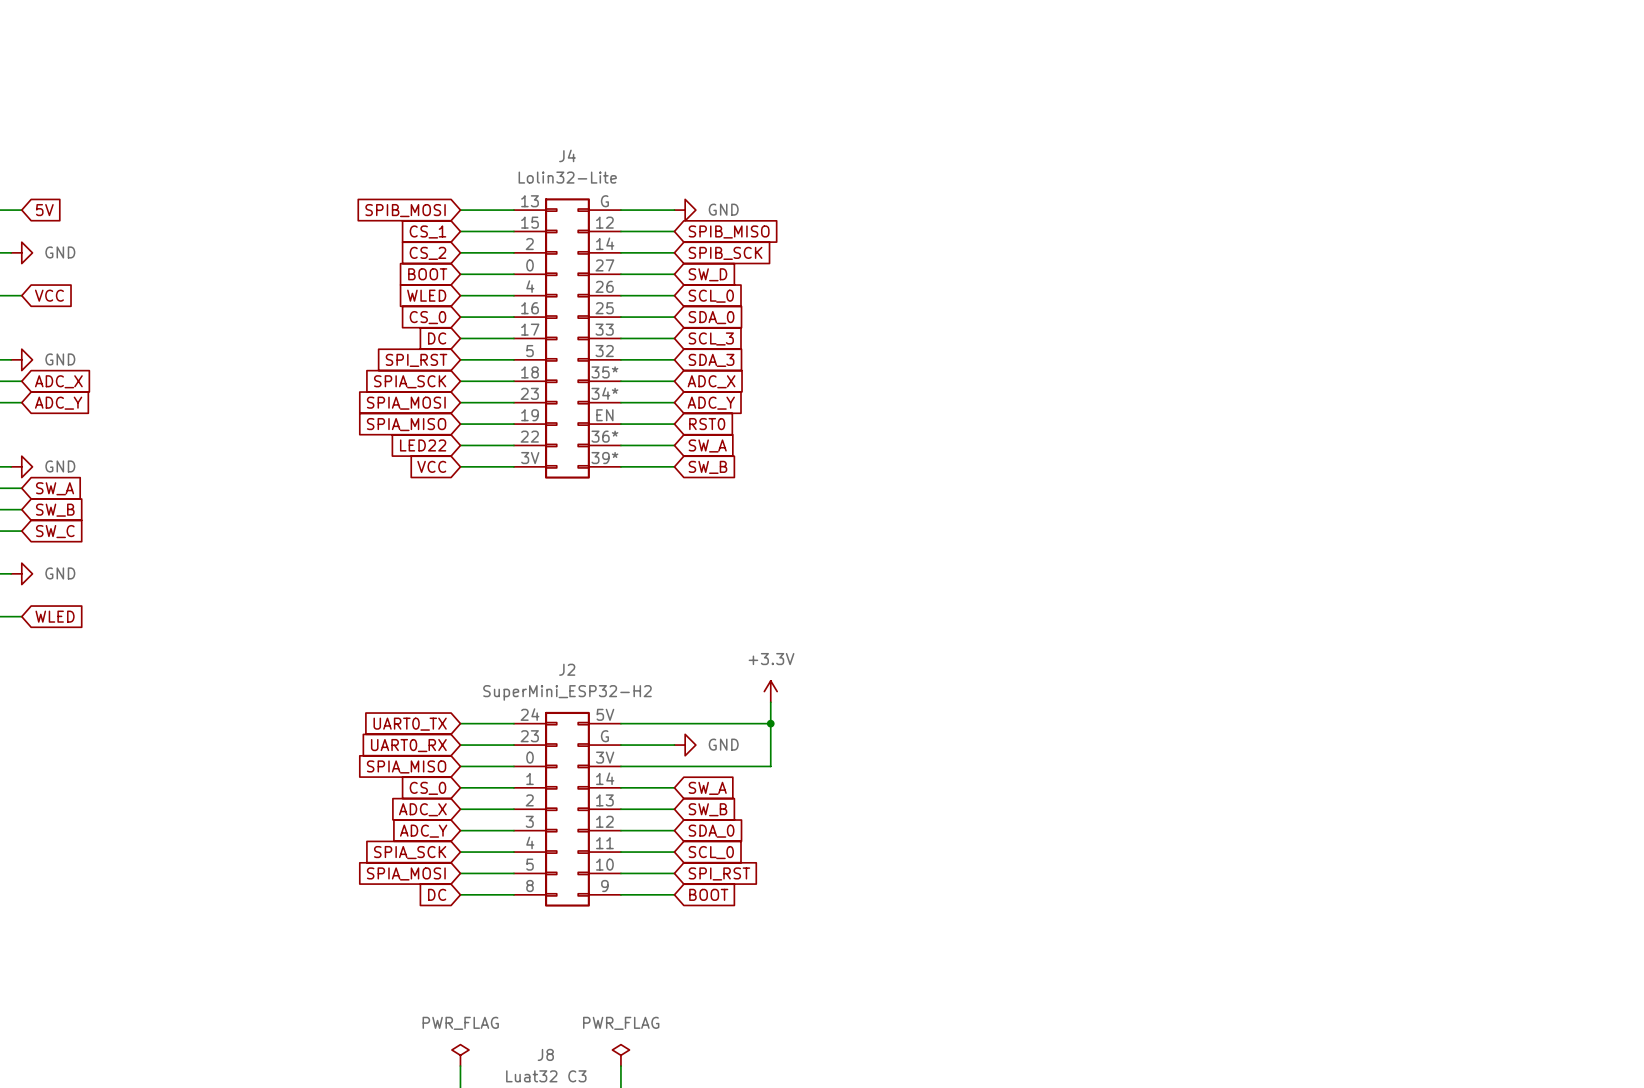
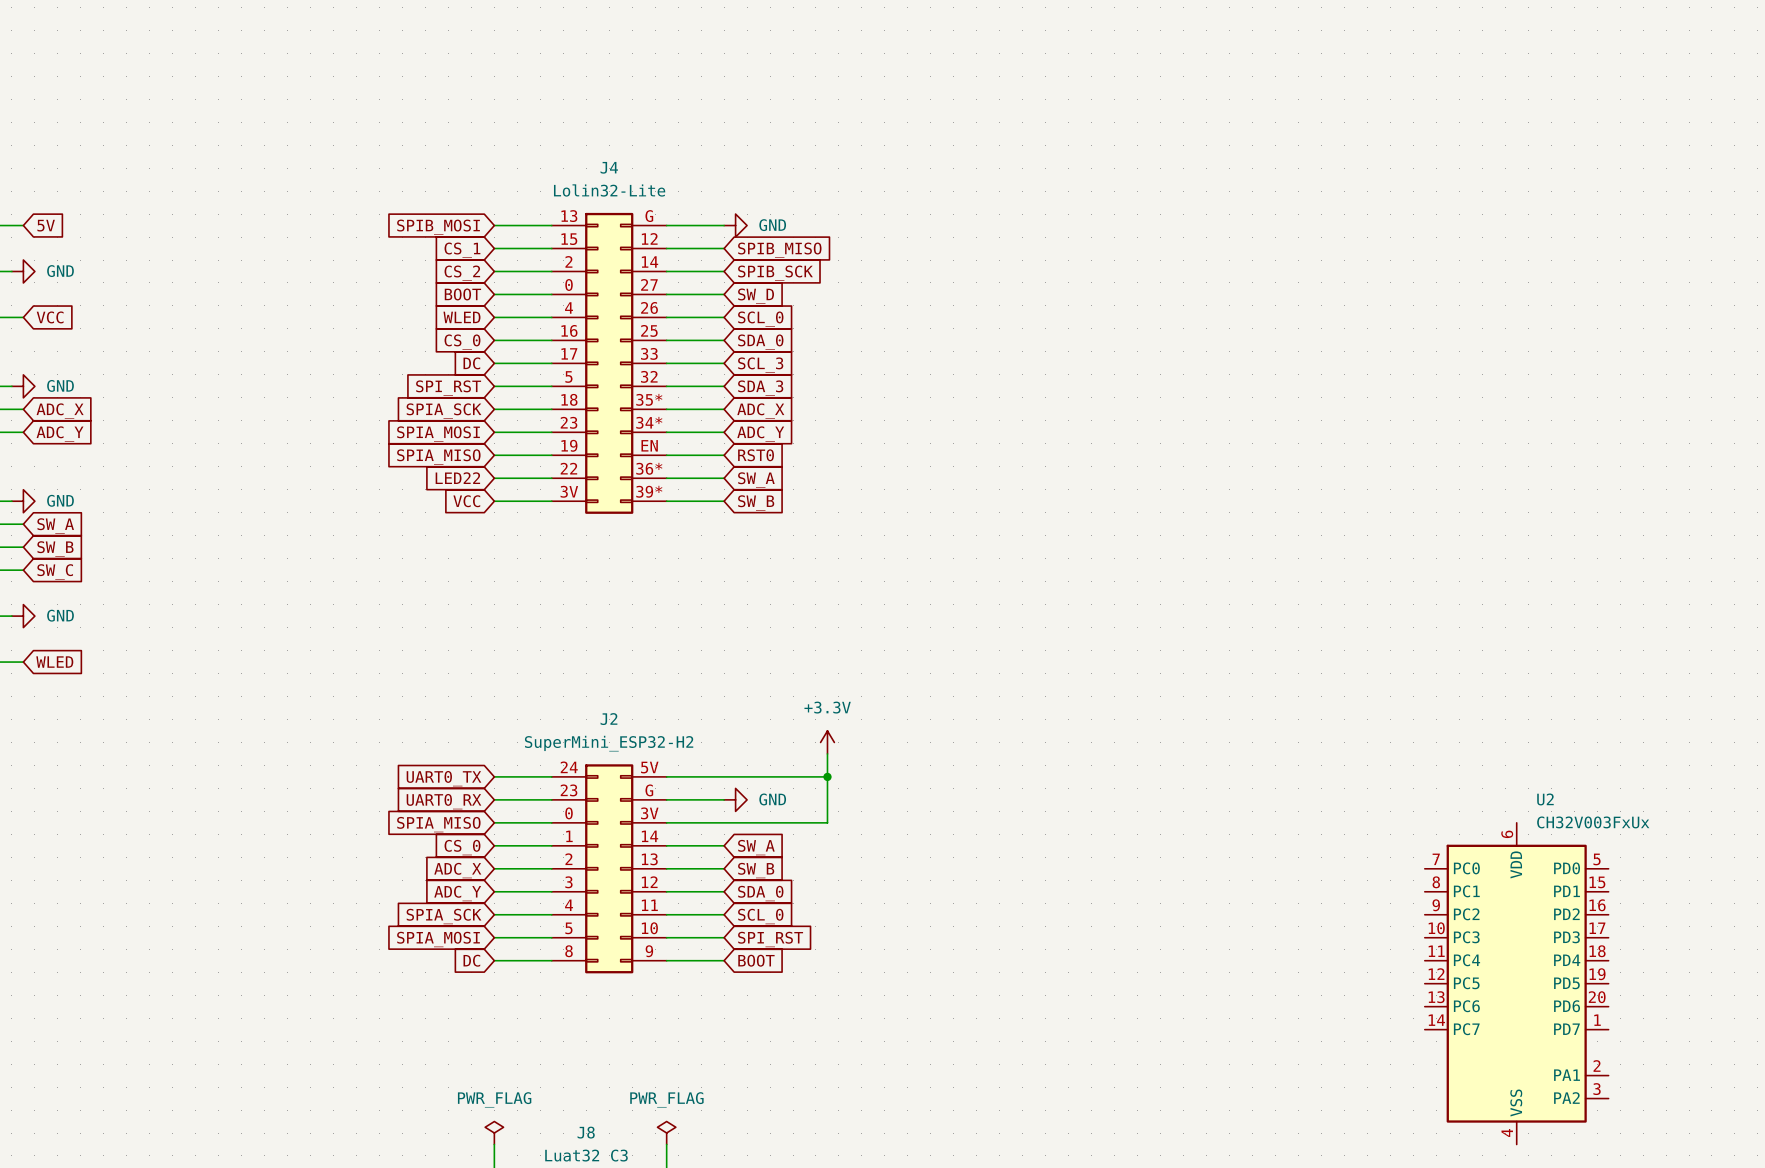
U2: none -> CH32V003FxUx (1516, 983)

